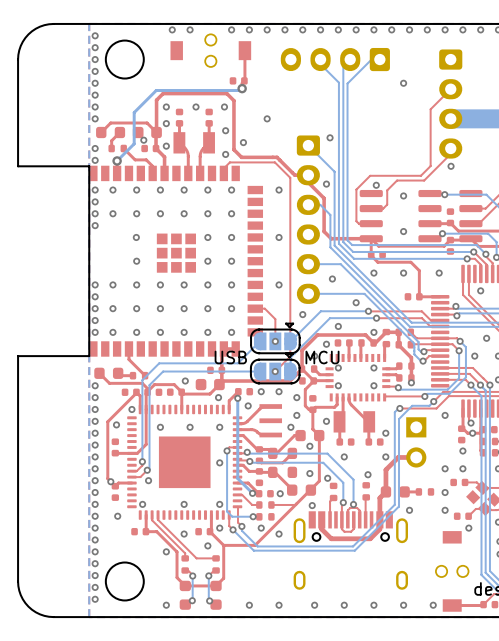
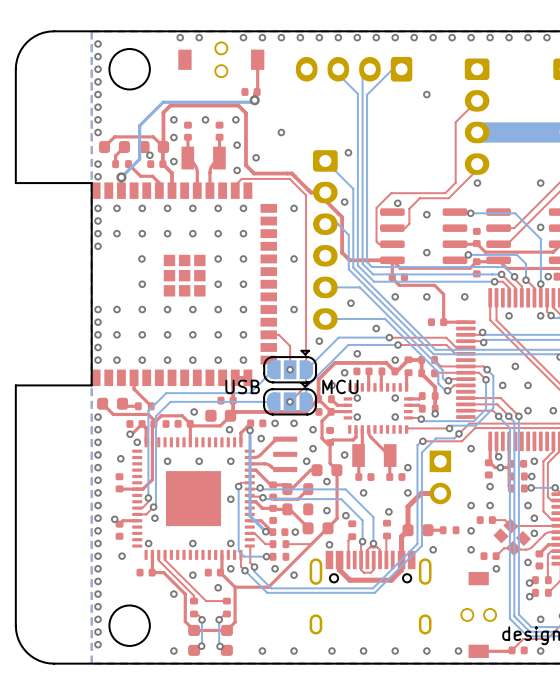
top track: (136, 392) (107, 421) (107, 478) (110, 481) -> (142, 424) (130, 434)
via: none -> (130, 434)

